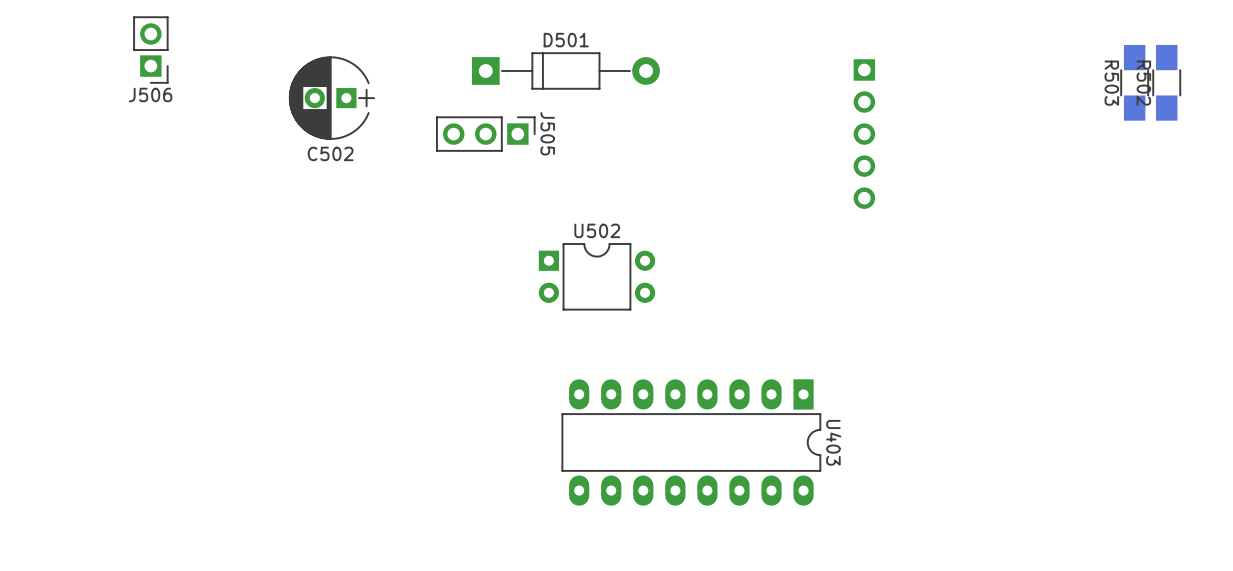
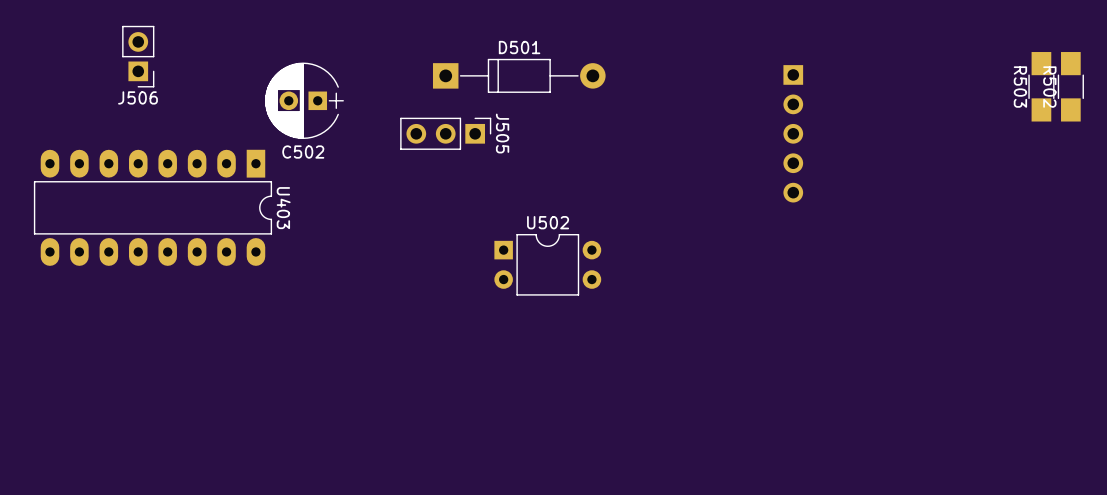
U403 position: (691, 442) -> (152, 207)

